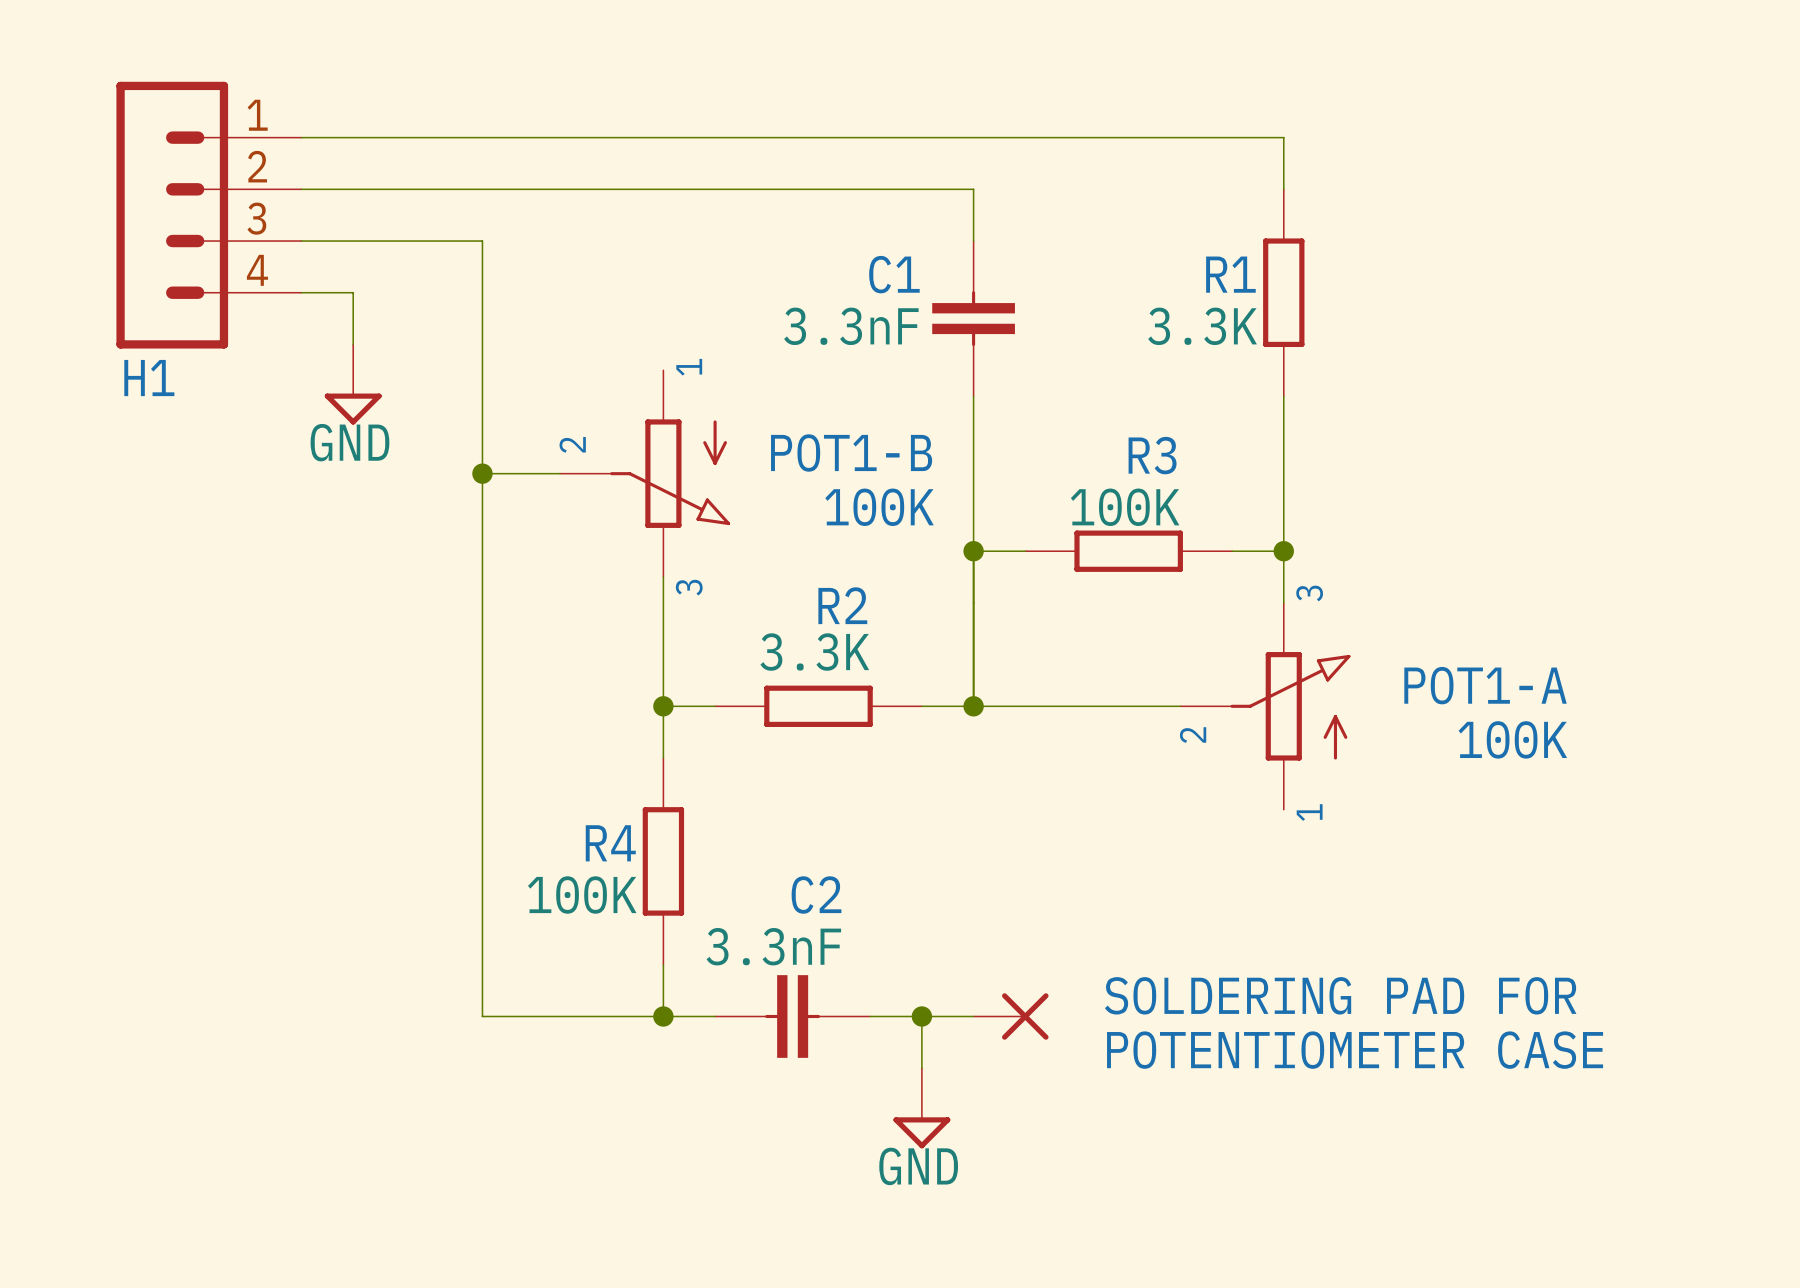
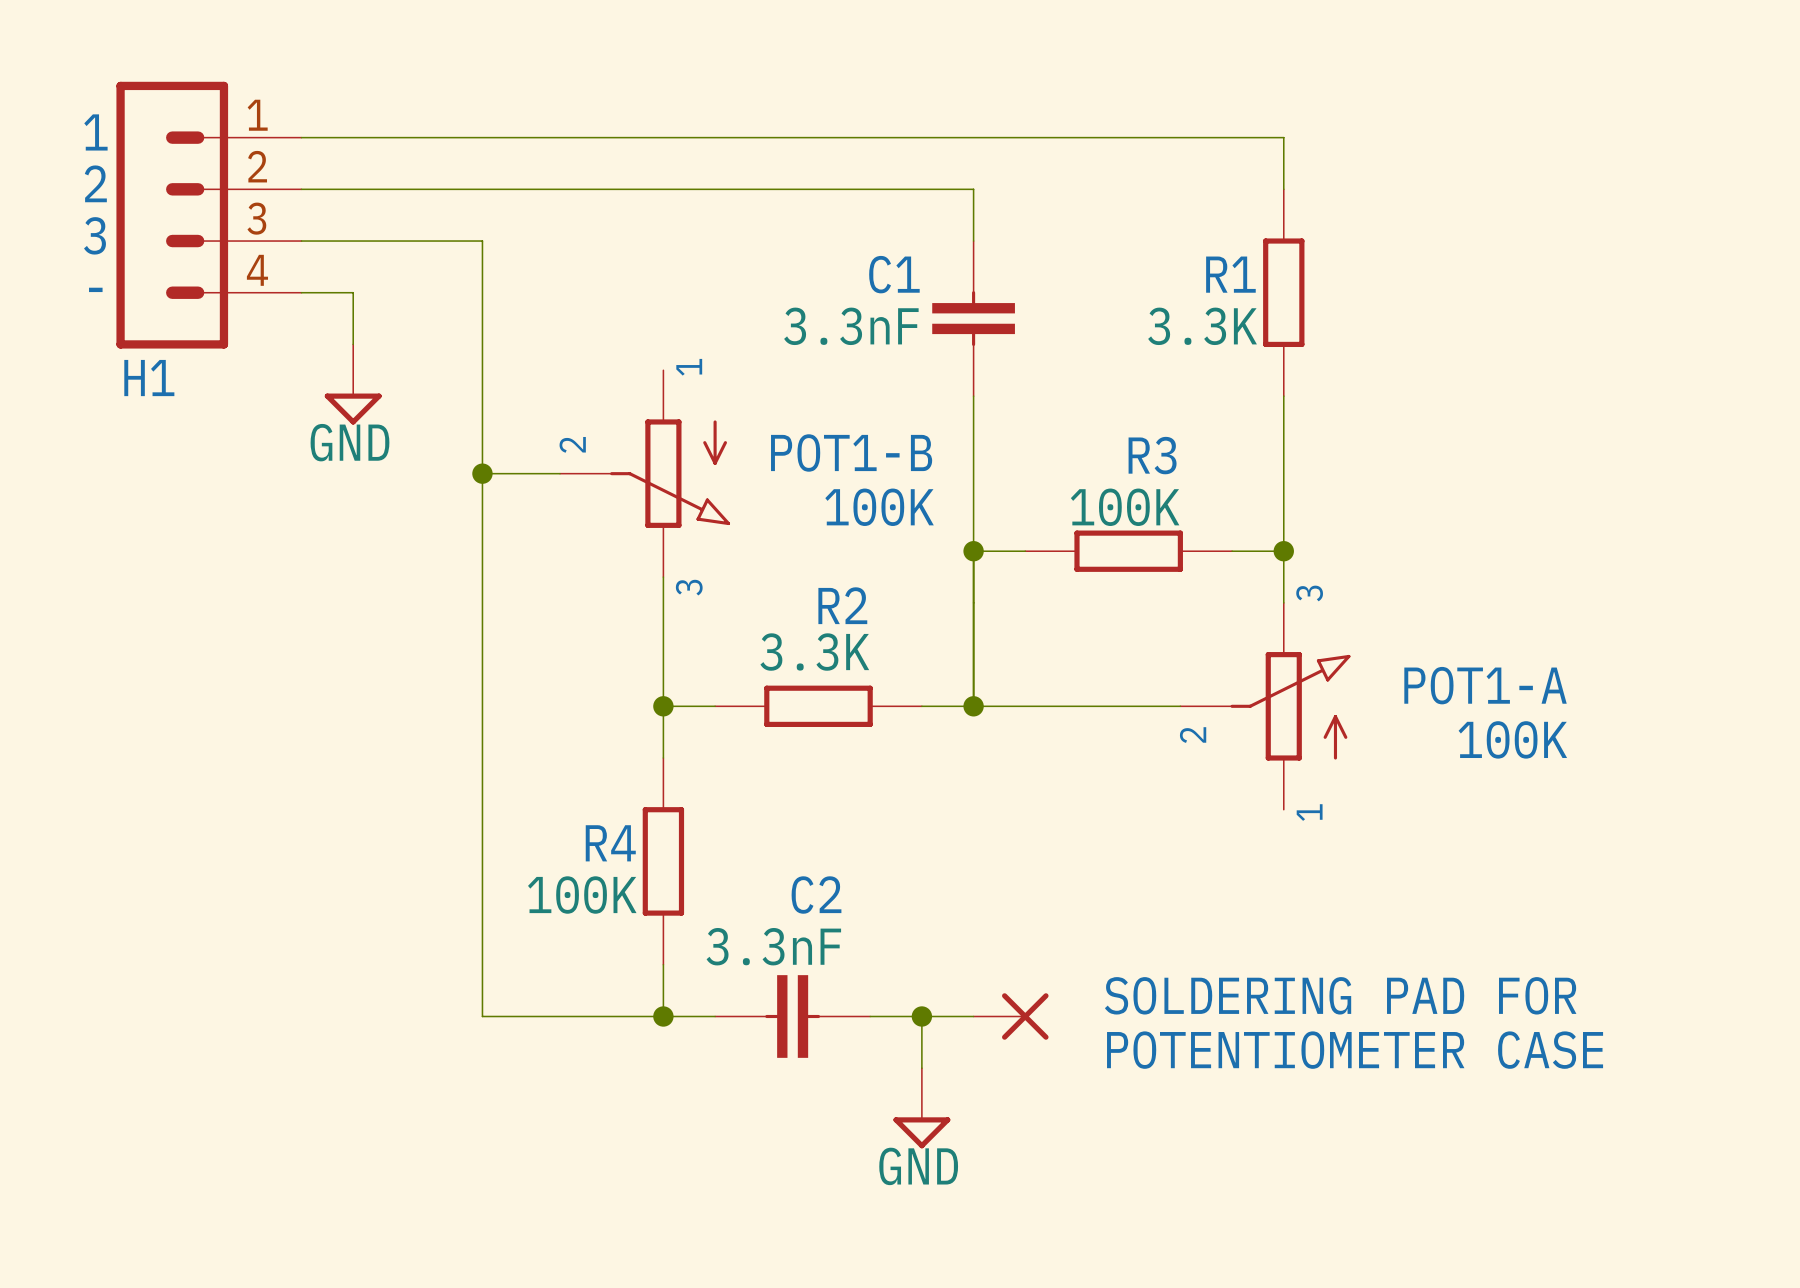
text: none -> 1 (95, 132)
text: none -> 2 (95, 183)
text: none -> 3 (95, 235)
text: none -> - (95, 289)

